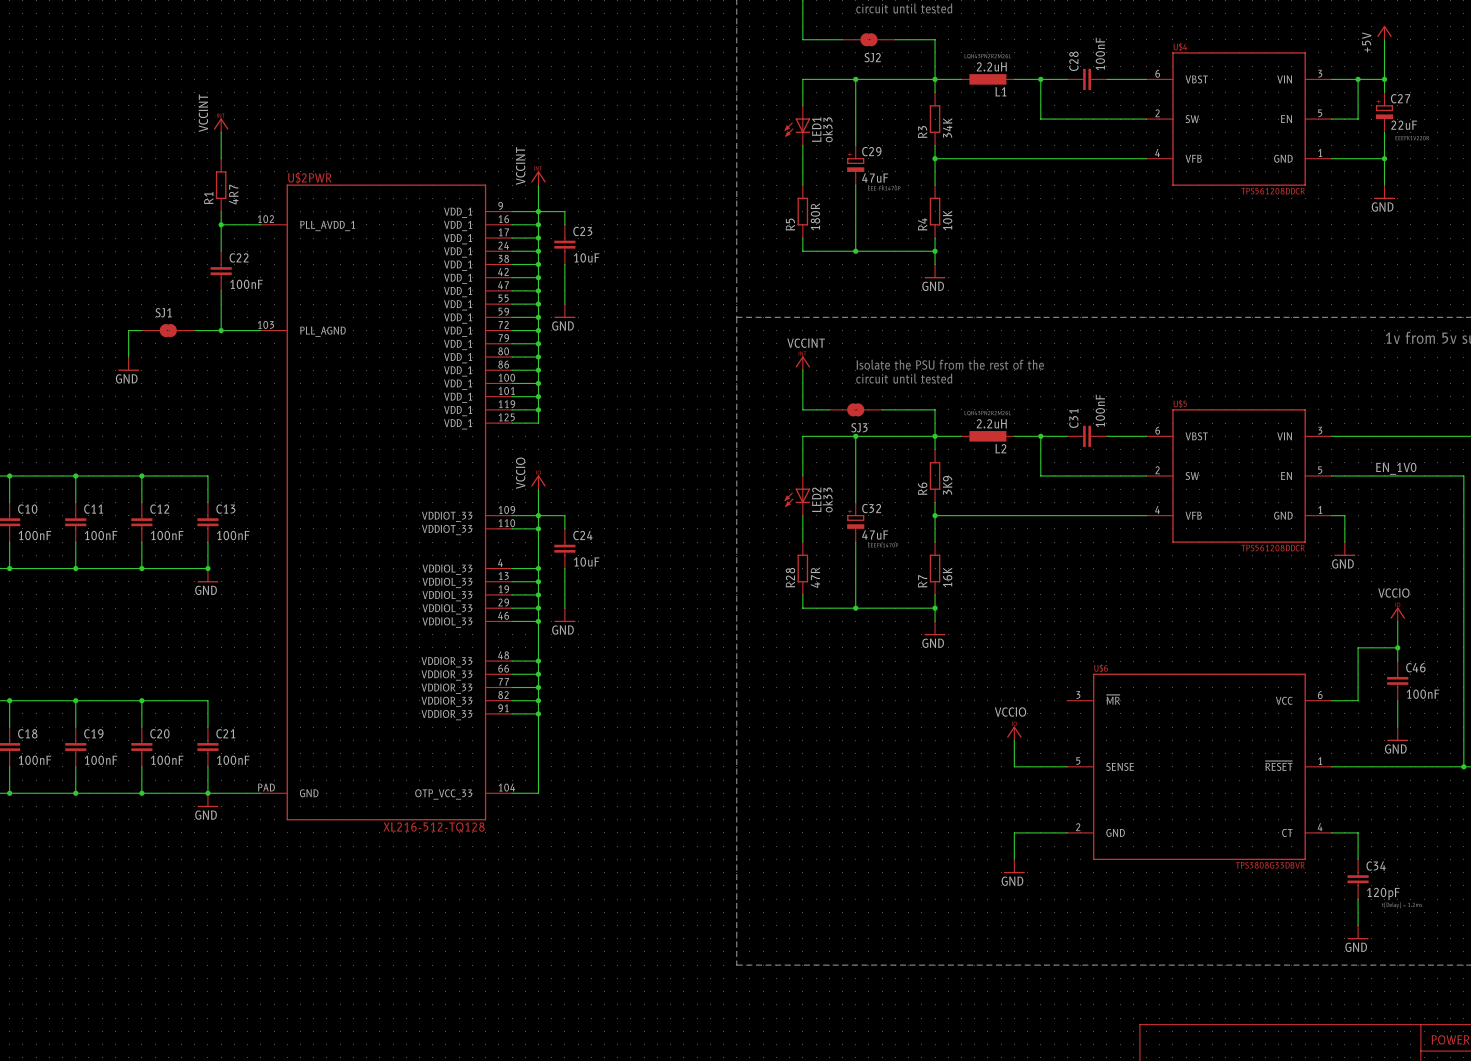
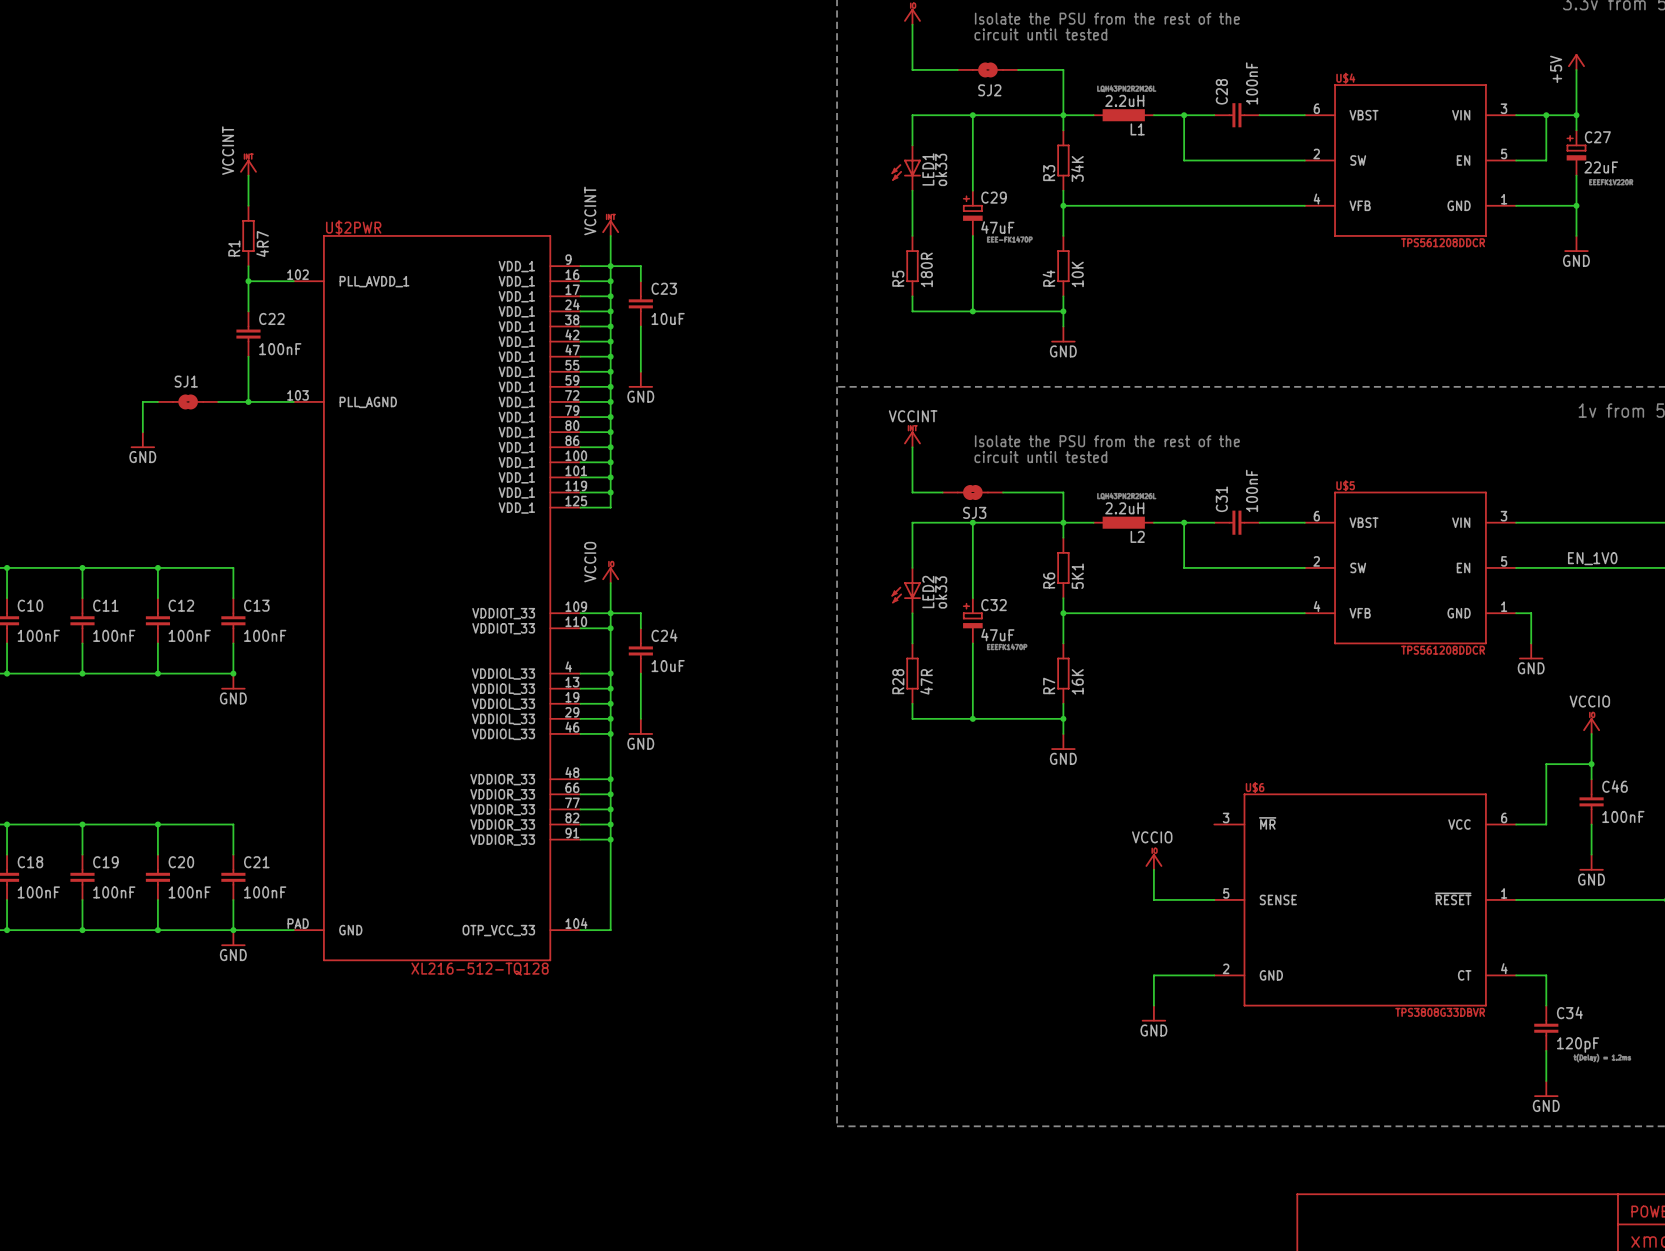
R6 value: 3K9 (947, 485) -> 5K1 (1077, 576)

